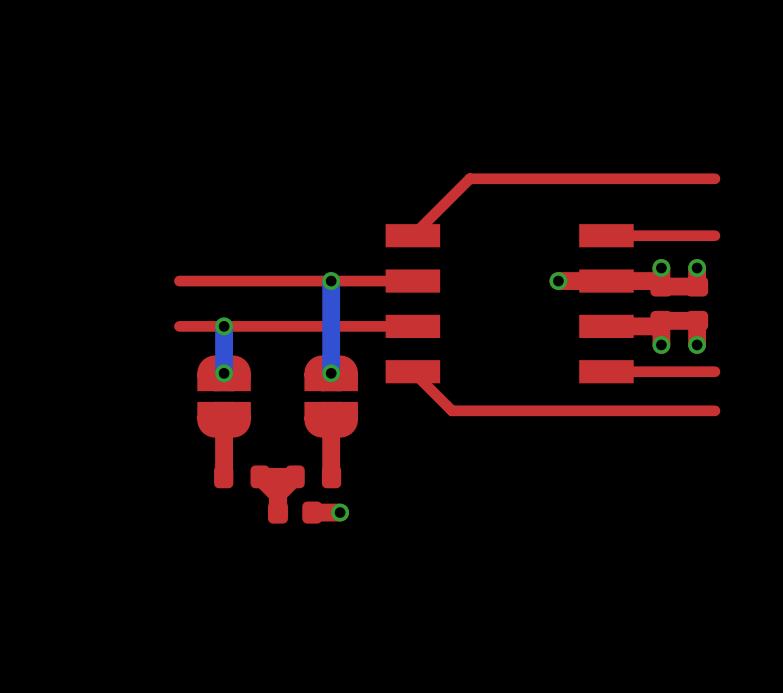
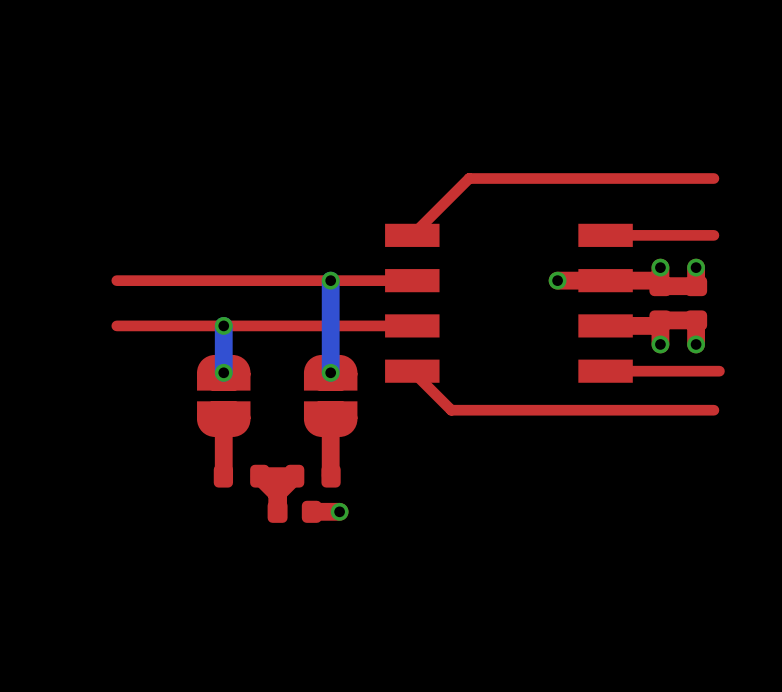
top track: none -> (179, 280) (116, 280)
top track: none -> (179, 325) (116, 325)
top track: none -> (719, 371) (713, 371)

